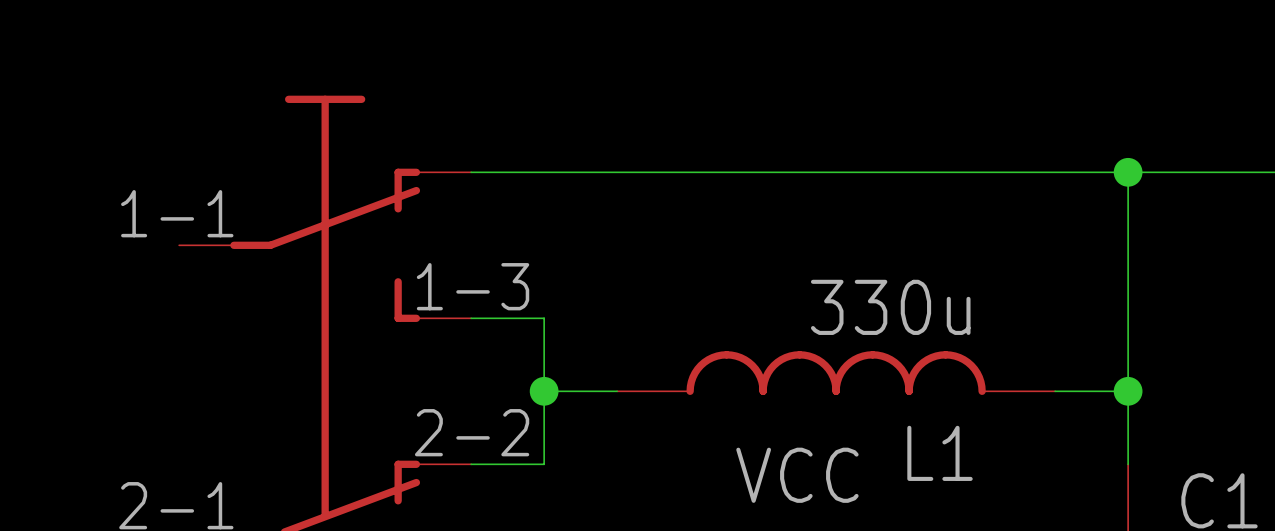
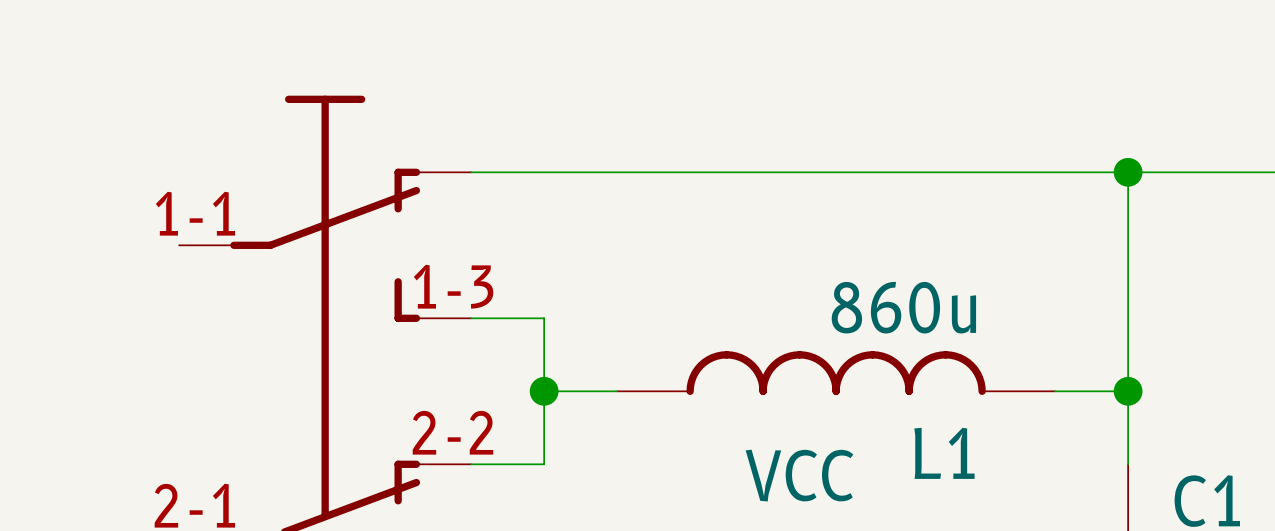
L1 value: 330u (890, 307) -> 860u (903, 307)

